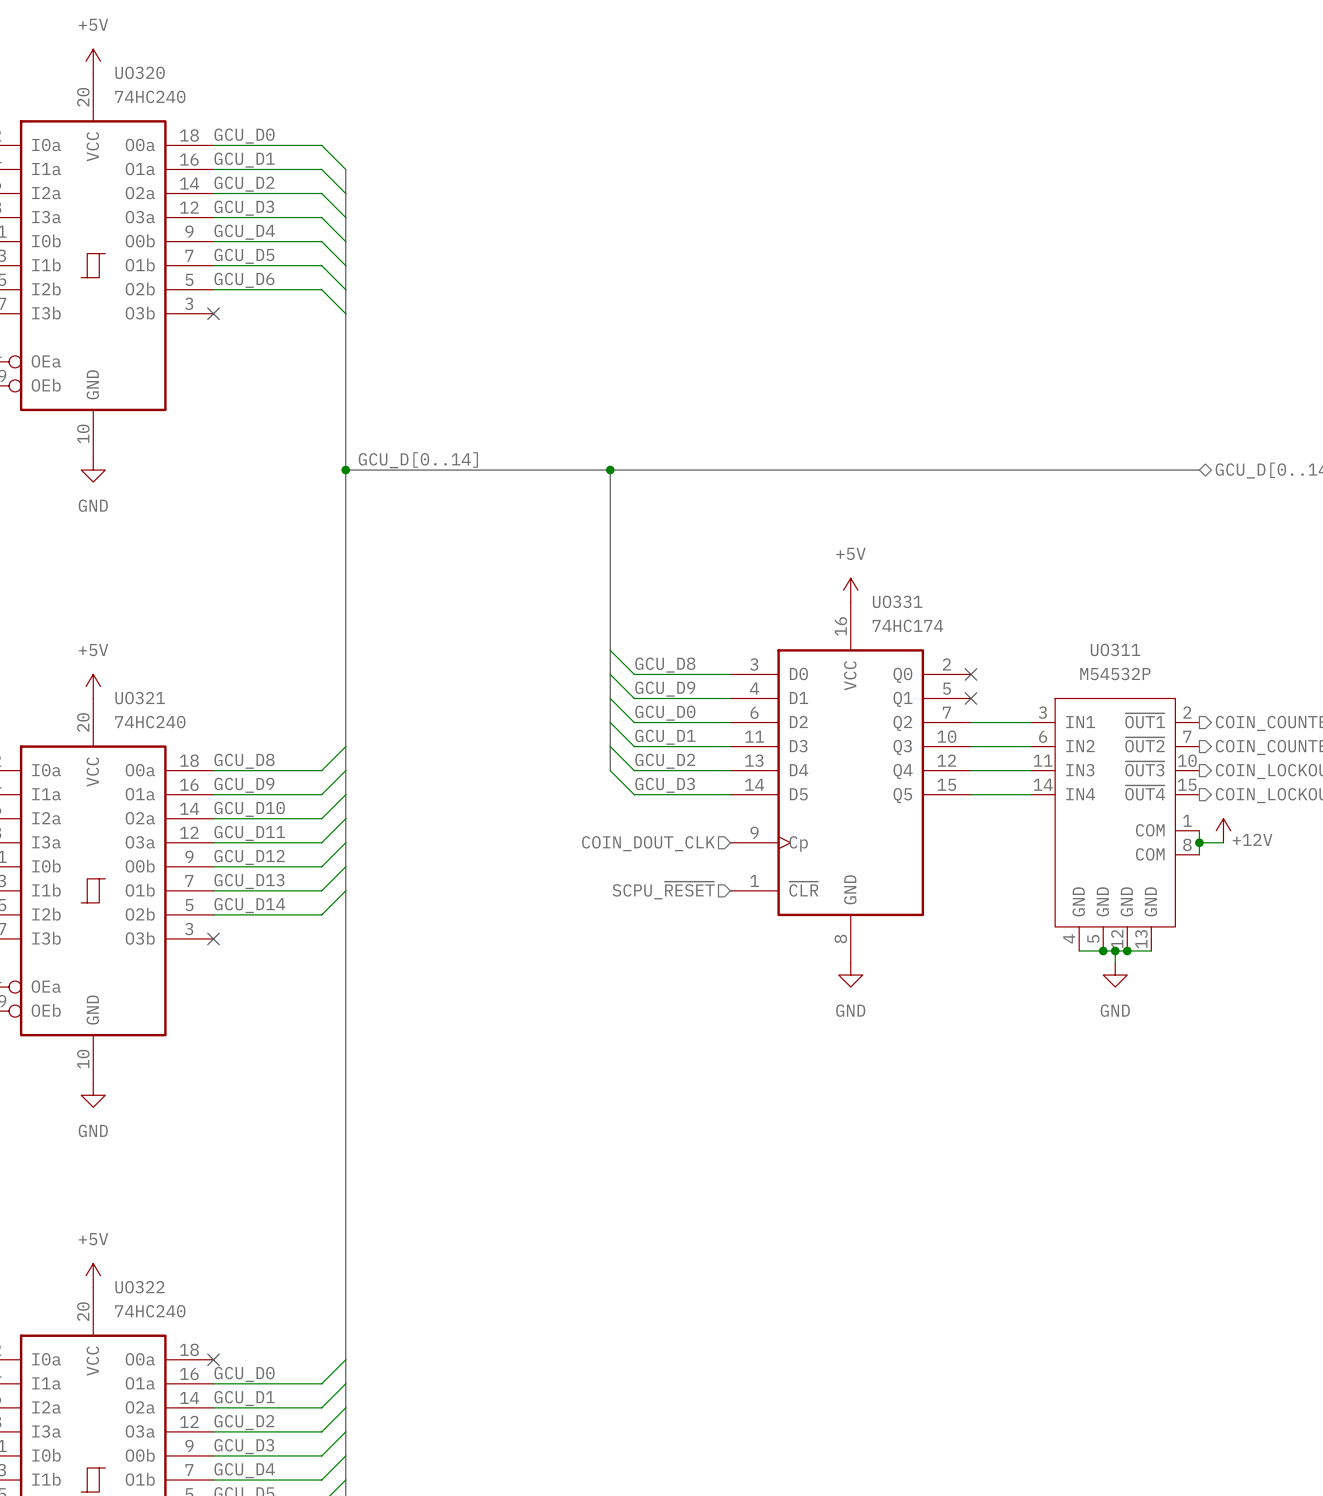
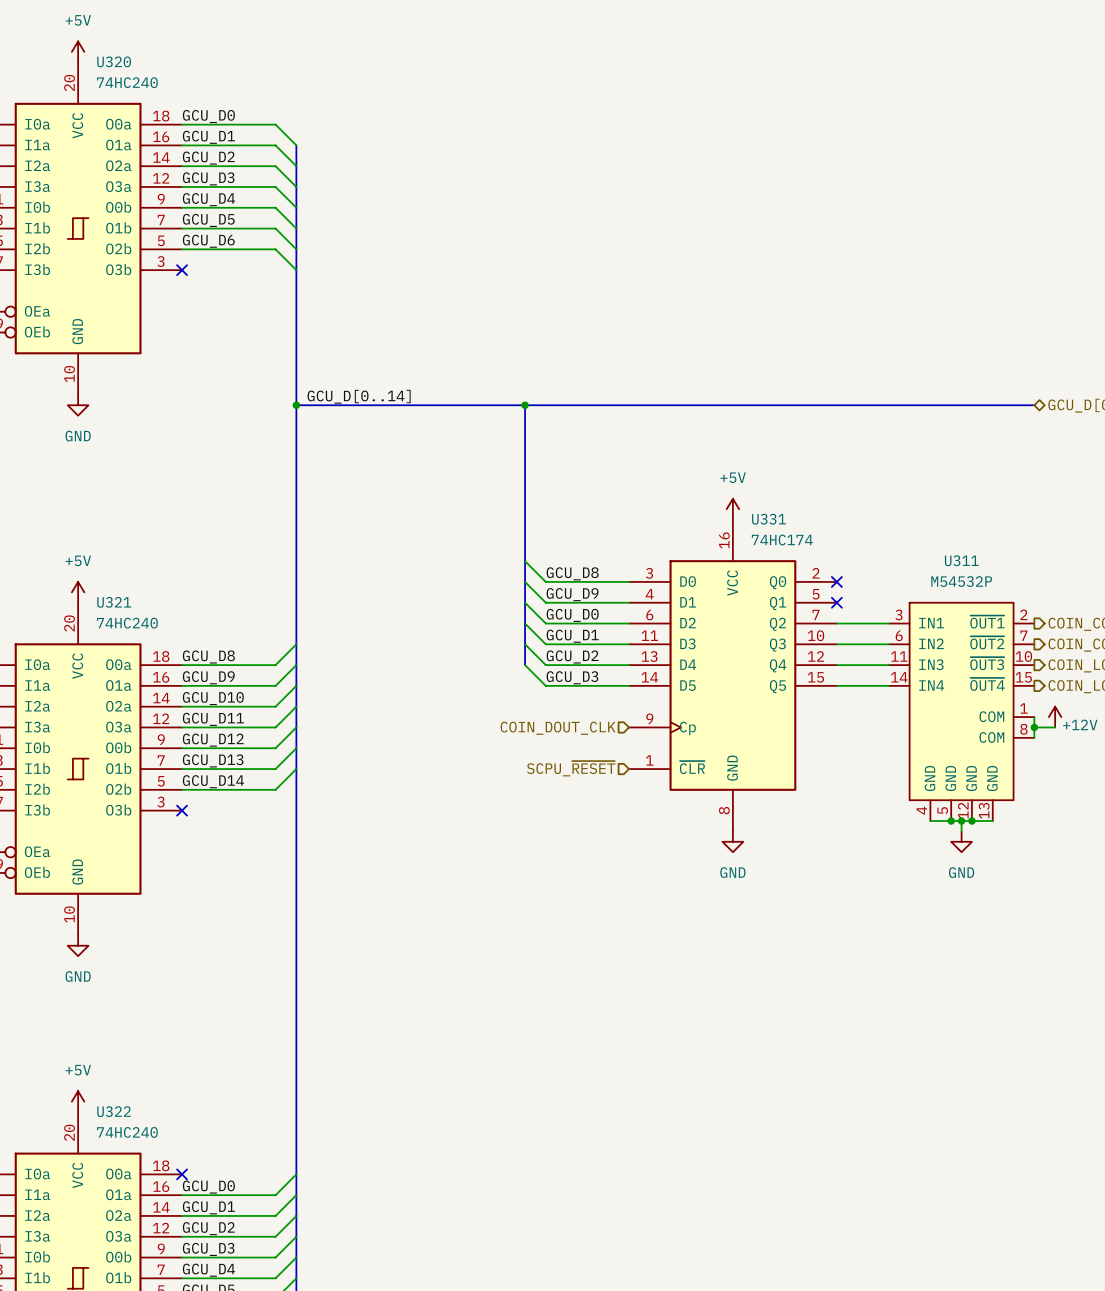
UO320 name: UO320 (140, 72) -> U320 (114, 61)
UO331 name: UO331 (897, 601) -> U331 (768, 519)
UO311 name: UO311 (1115, 649) -> U311 (961, 560)
UO321 name: UO321 (140, 698) -> U321 (114, 602)
UO322 name: UO322 (140, 1287) -> U322 (114, 1111)

